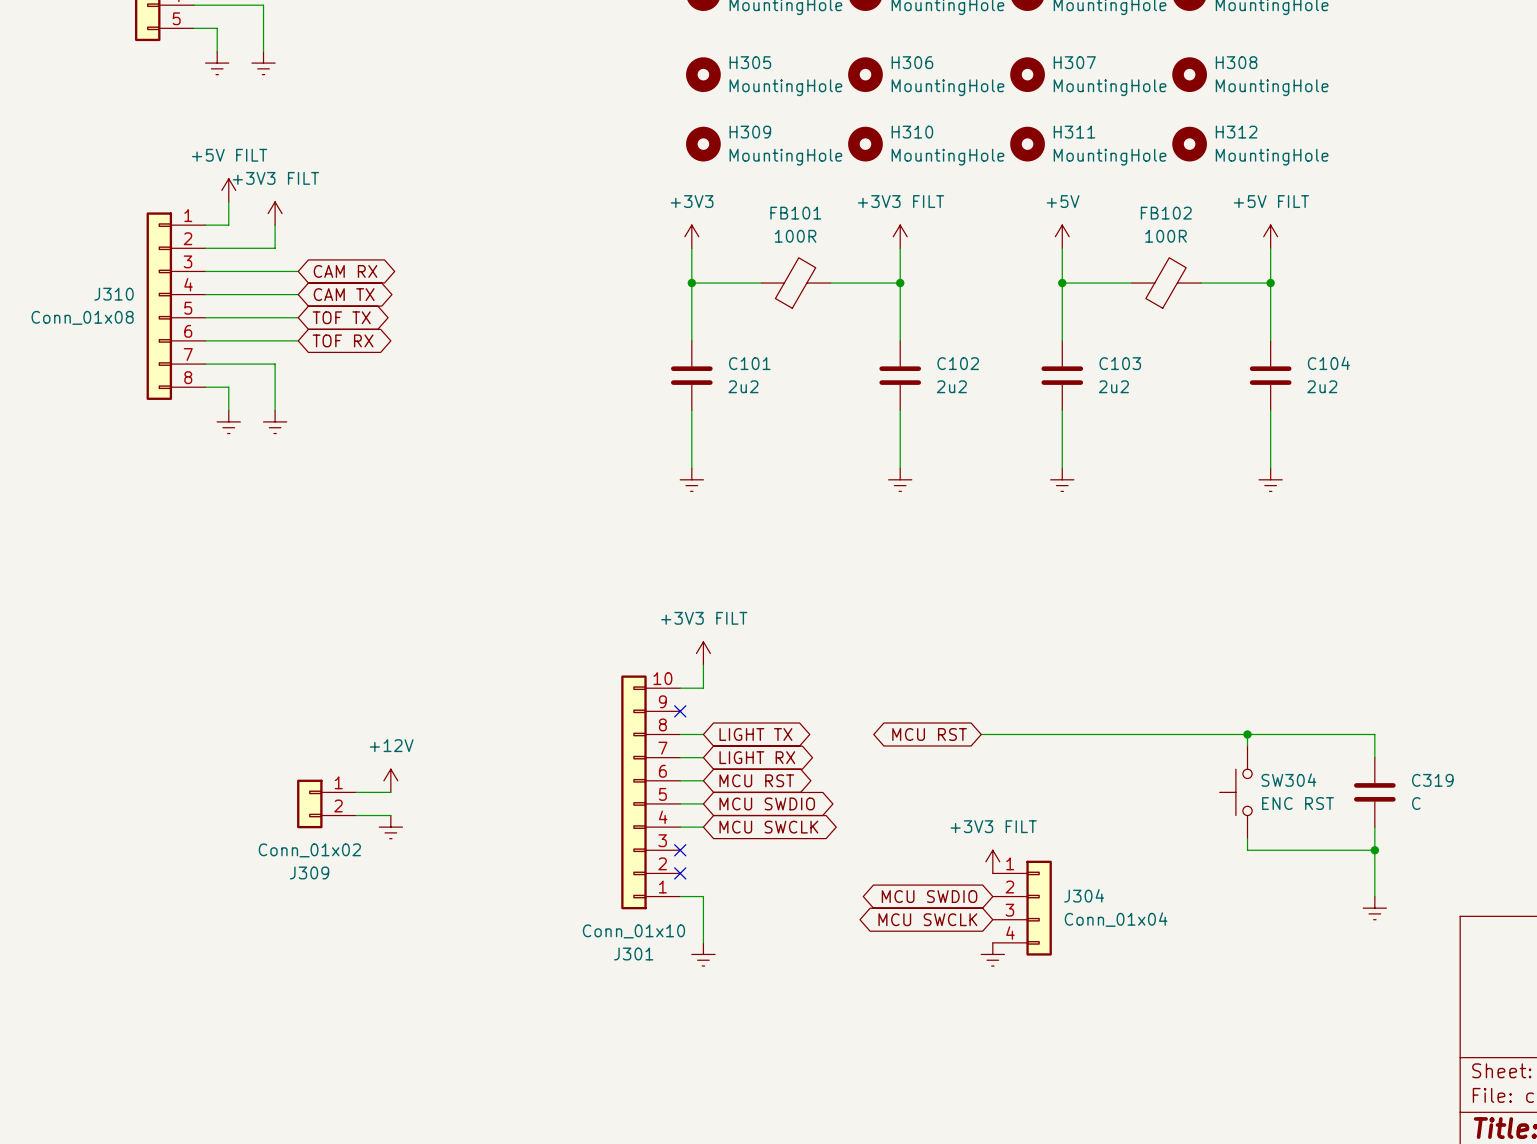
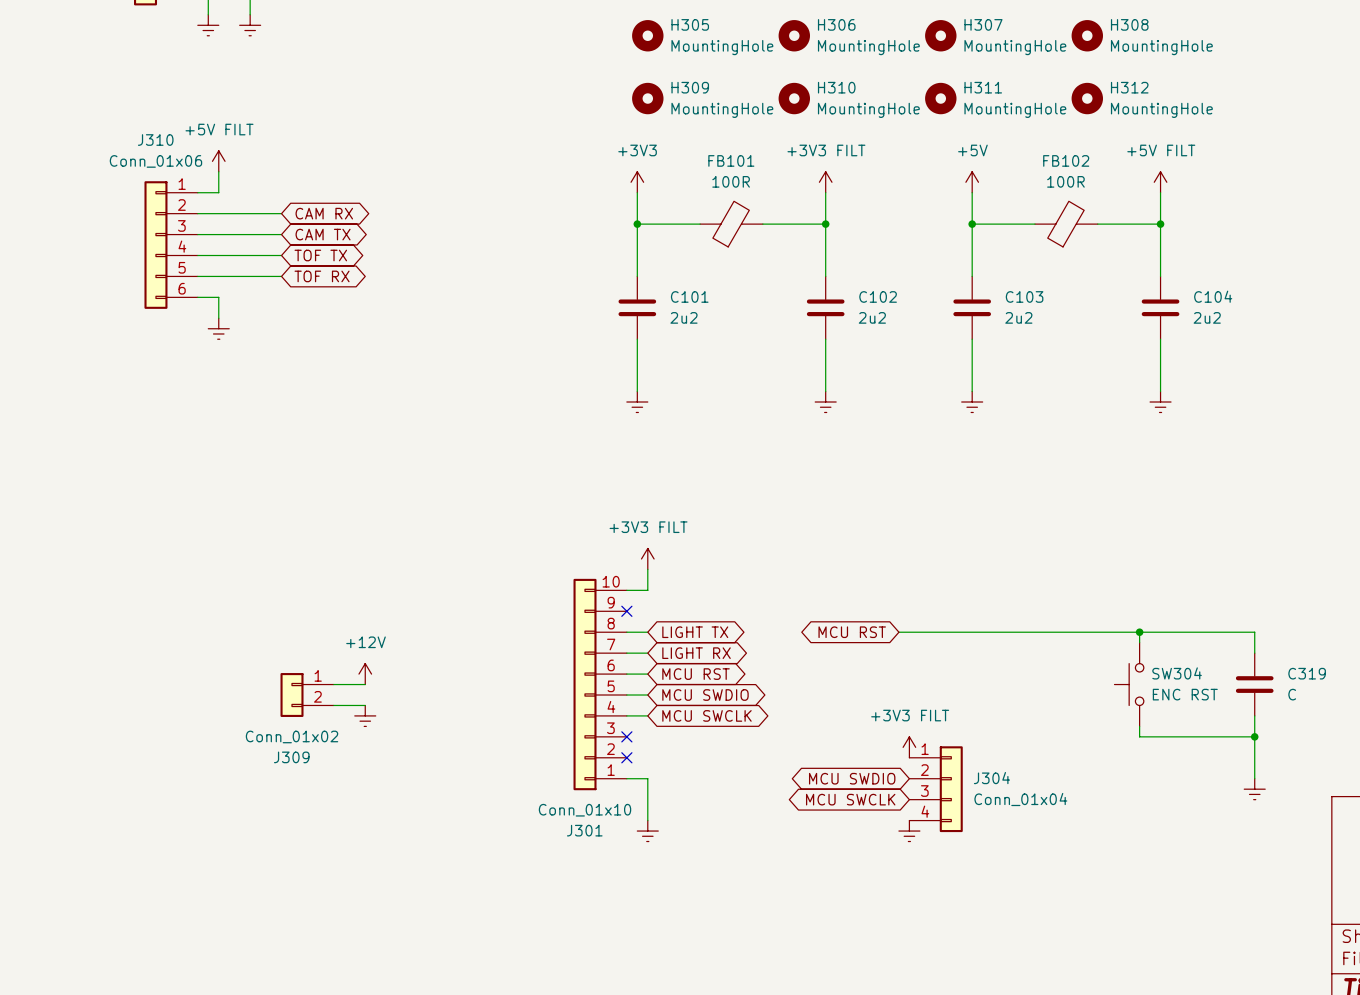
power symbol position: +5V FILT (228, 190) -> +5V FILT (218, 161)
wire: (228, 201) (228, 225) (205, 225) -> none
J310 symbol: [146, 212, 206, 400] -> [144, 181, 198, 309]
power symbol: +3V3 FILT (275, 213) -> none
wire: (275, 225) (275, 248) (228, 248) -> (218, 171) (218, 192)
J310 name position: J310 (114, 294) -> J310 (155, 140)
J310 value: Conn_01x08 (82, 317) -> Conn_01x06 (155, 161)
wire: (228, 364) (275, 364) (275, 410) -> (218, 297) (218, 318)
wire: (205, 387) (228, 387) (228, 410) -> none
power symbol position: (228, 421) -> (218, 328)
power symbol: (275, 421) -> none

